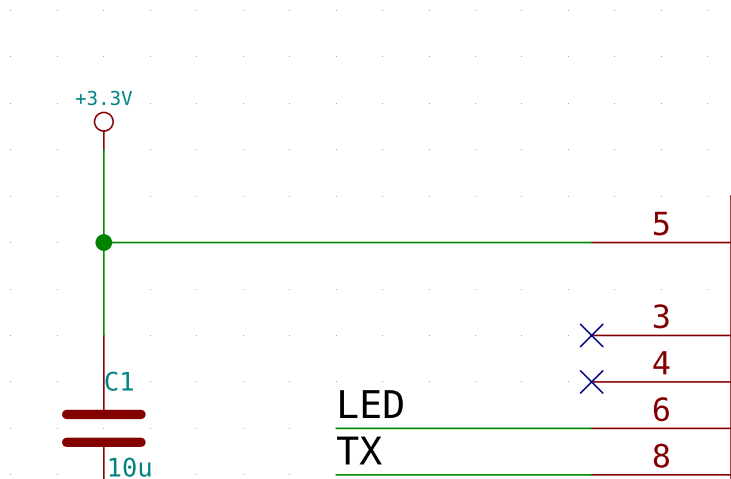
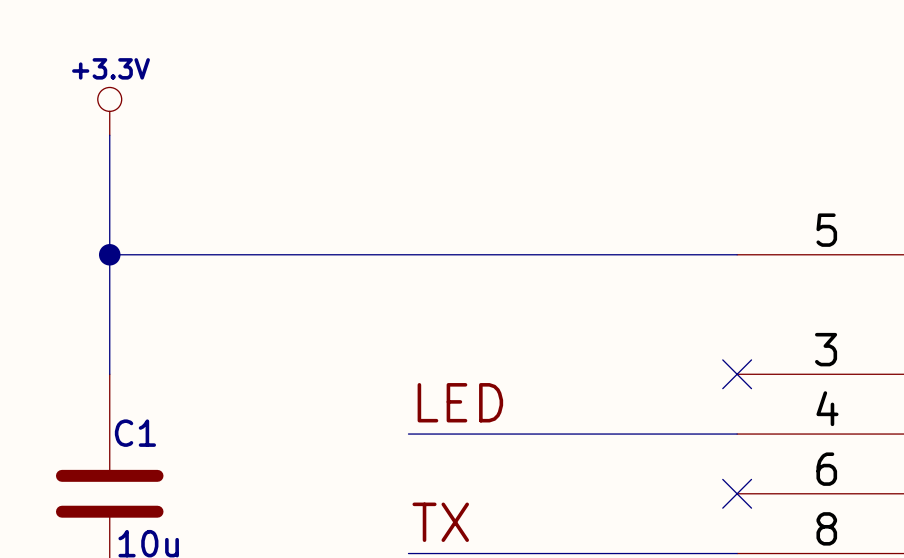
no-connect mark position: (591, 381) -> (737, 493)
label position: LED (371, 404) -> LED (460, 402)
wire: (336, 428) (591, 428) -> (408, 434) (737, 434)

